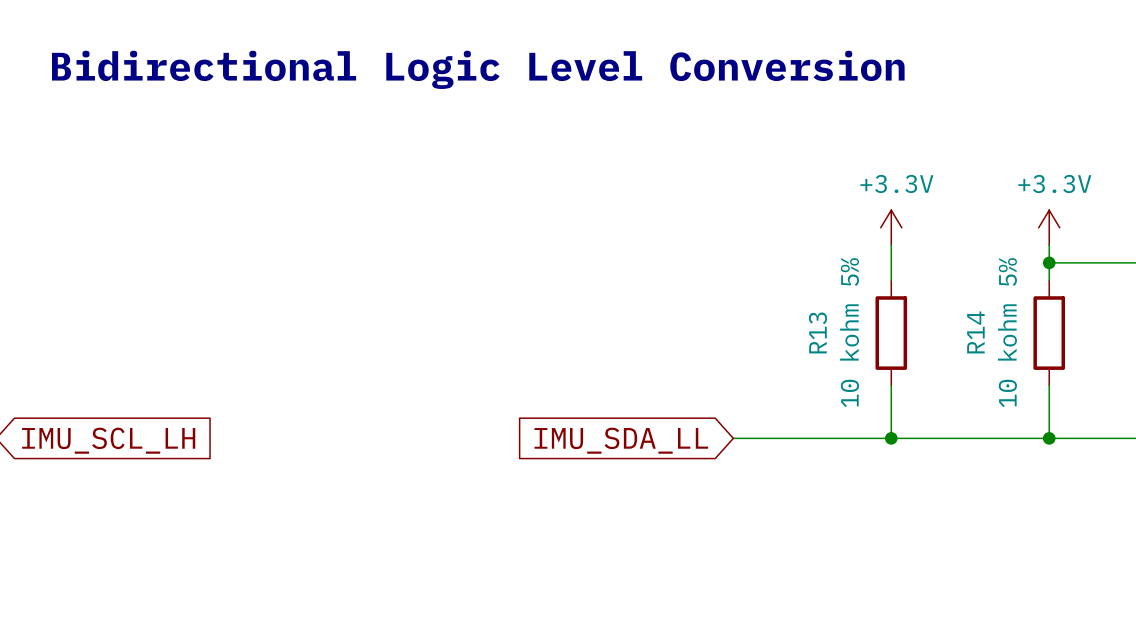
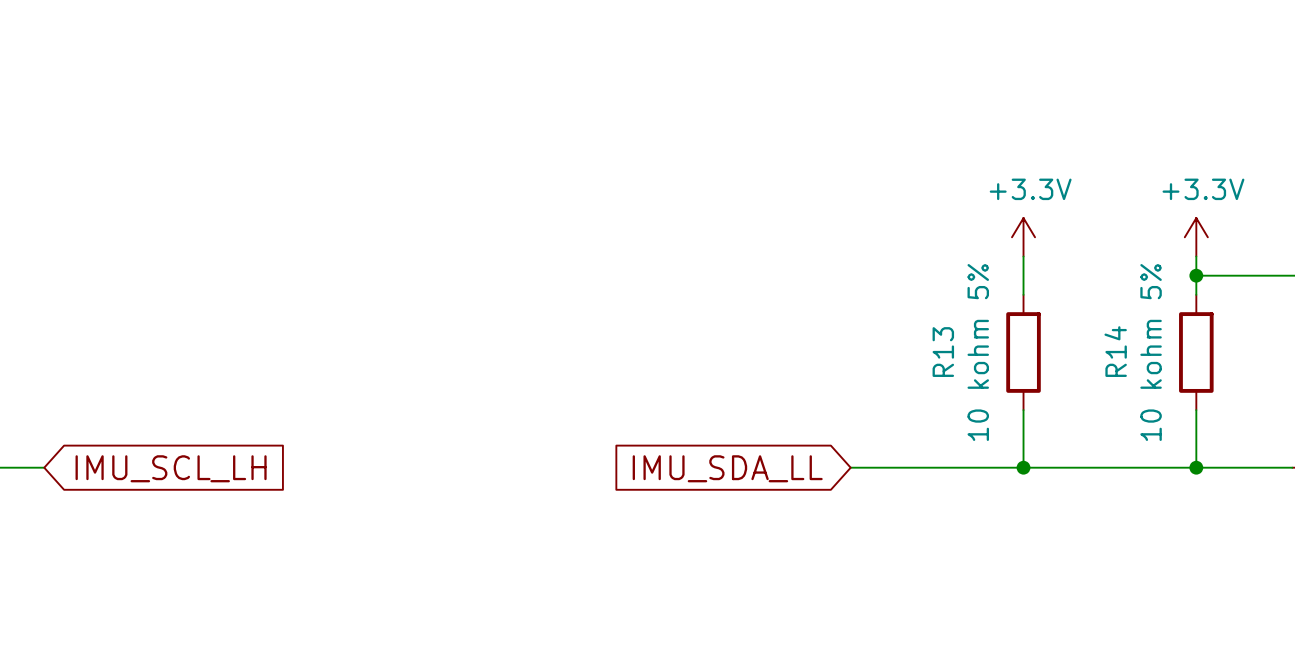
text: Bidirectional Logic Level Conversion (478, 69) -> none

